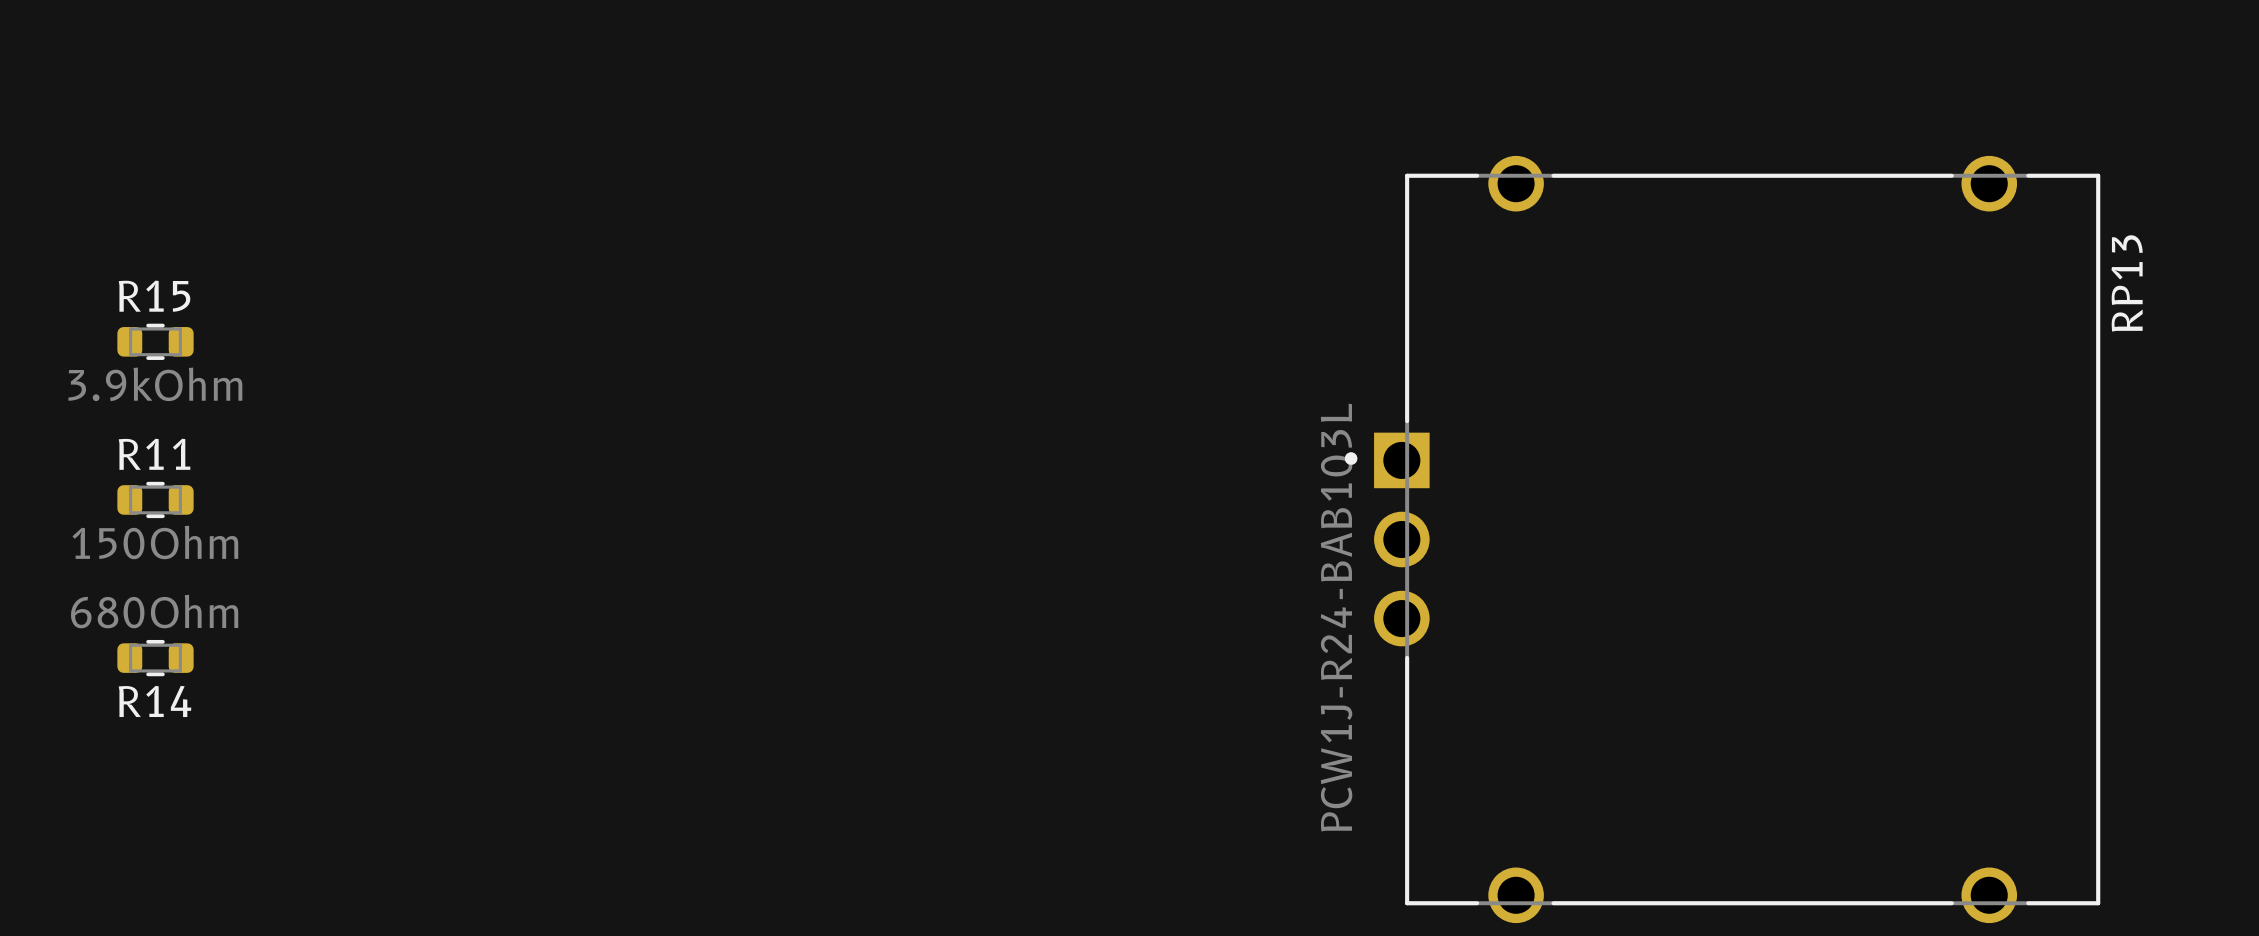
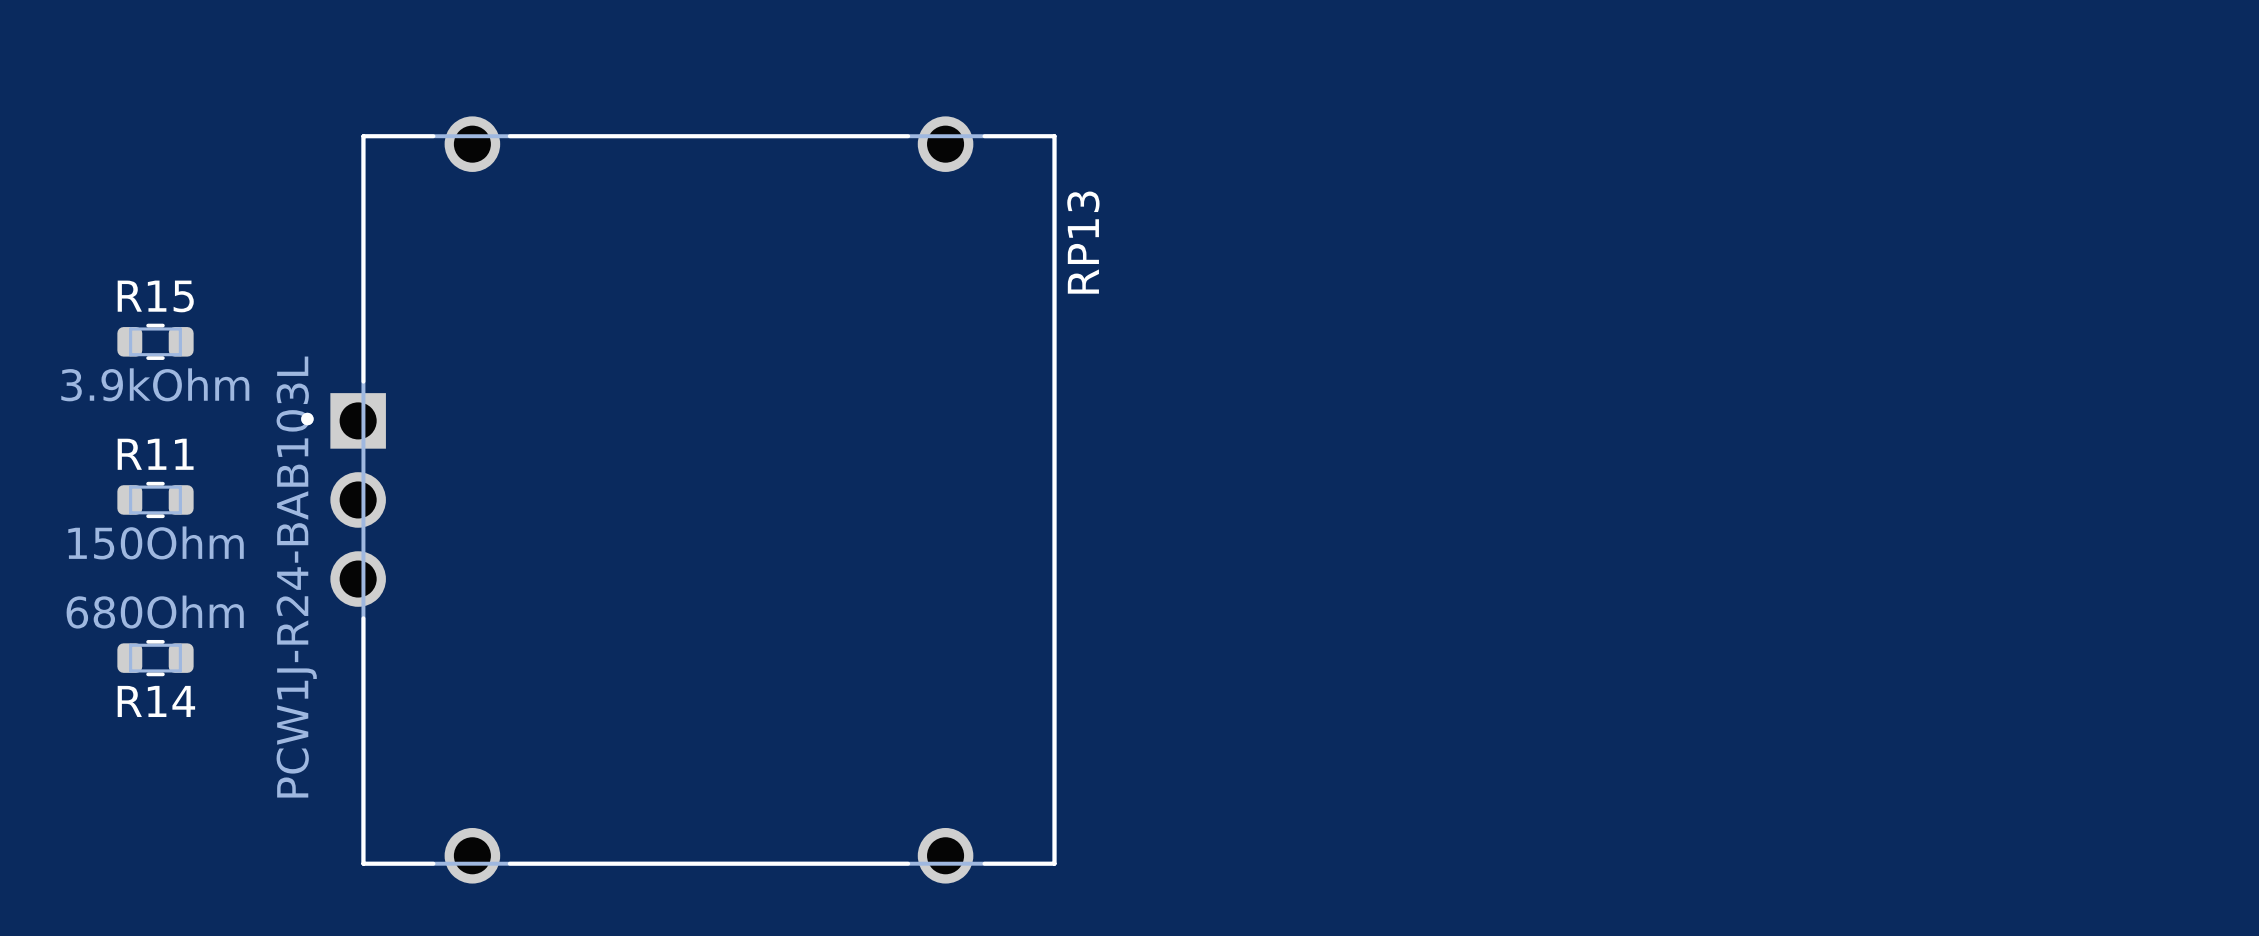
RP13 position: (1722, 539) -> (678, 499)

